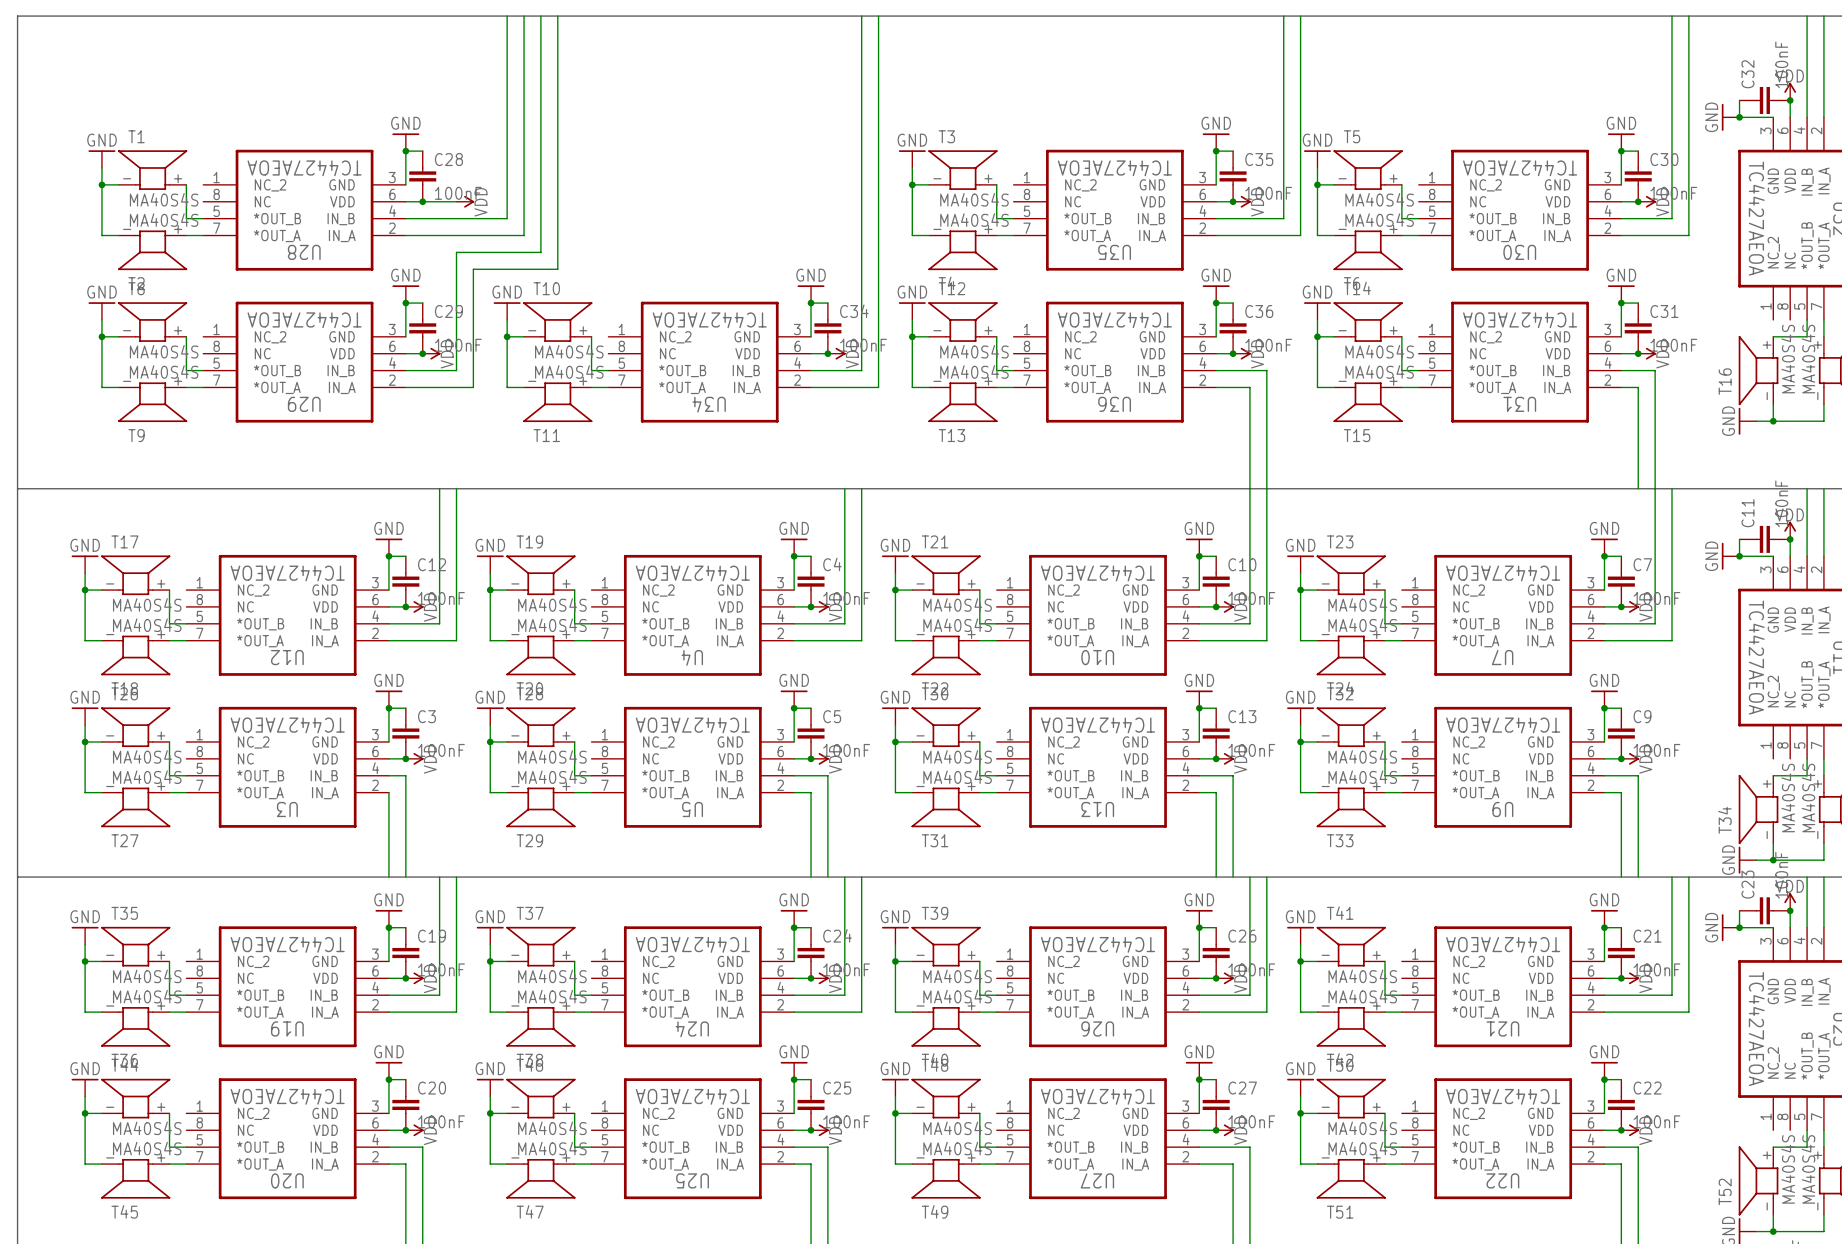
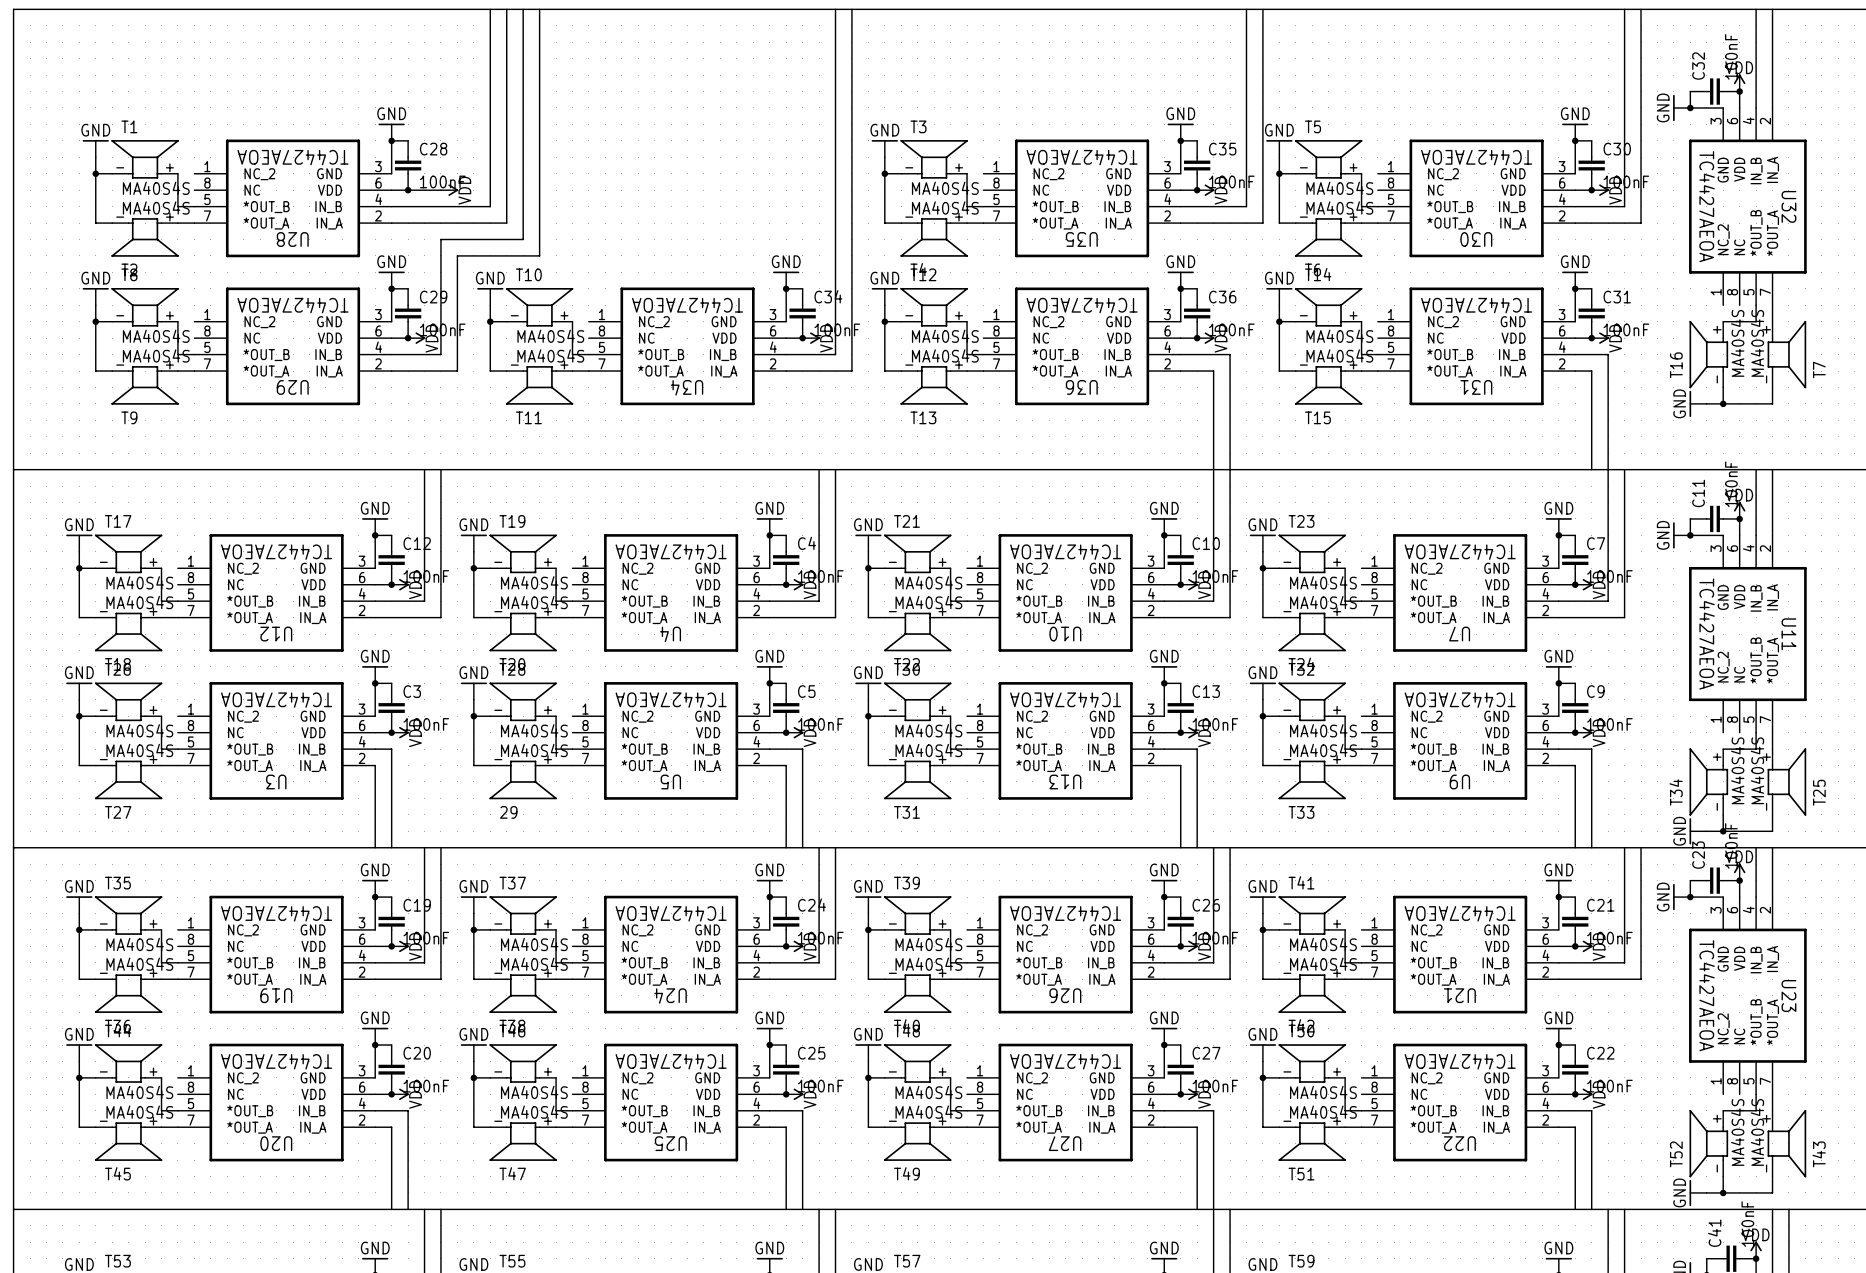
T29 name: T29 (529, 840) -> 29 (508, 812)

